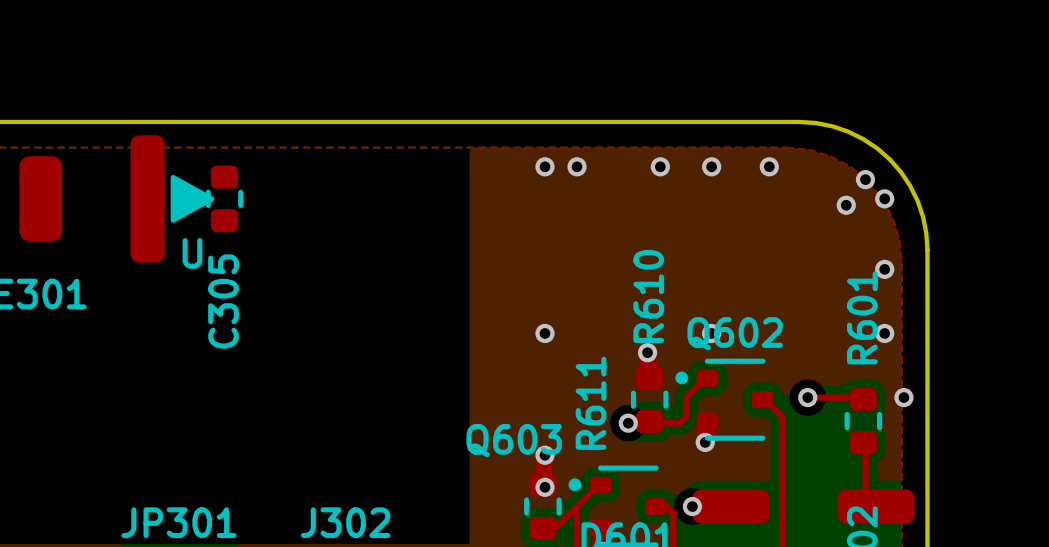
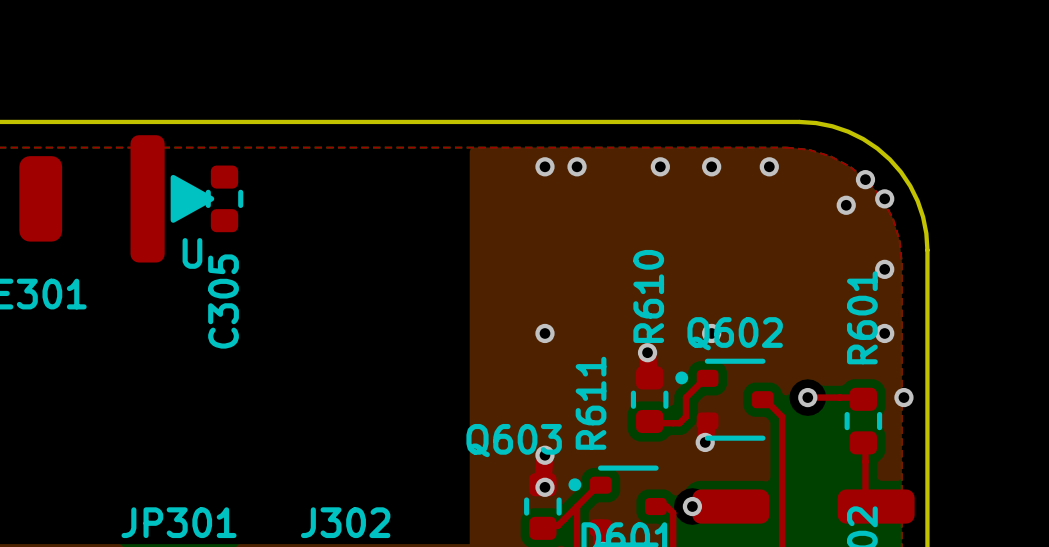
via: (628, 423) -> none

